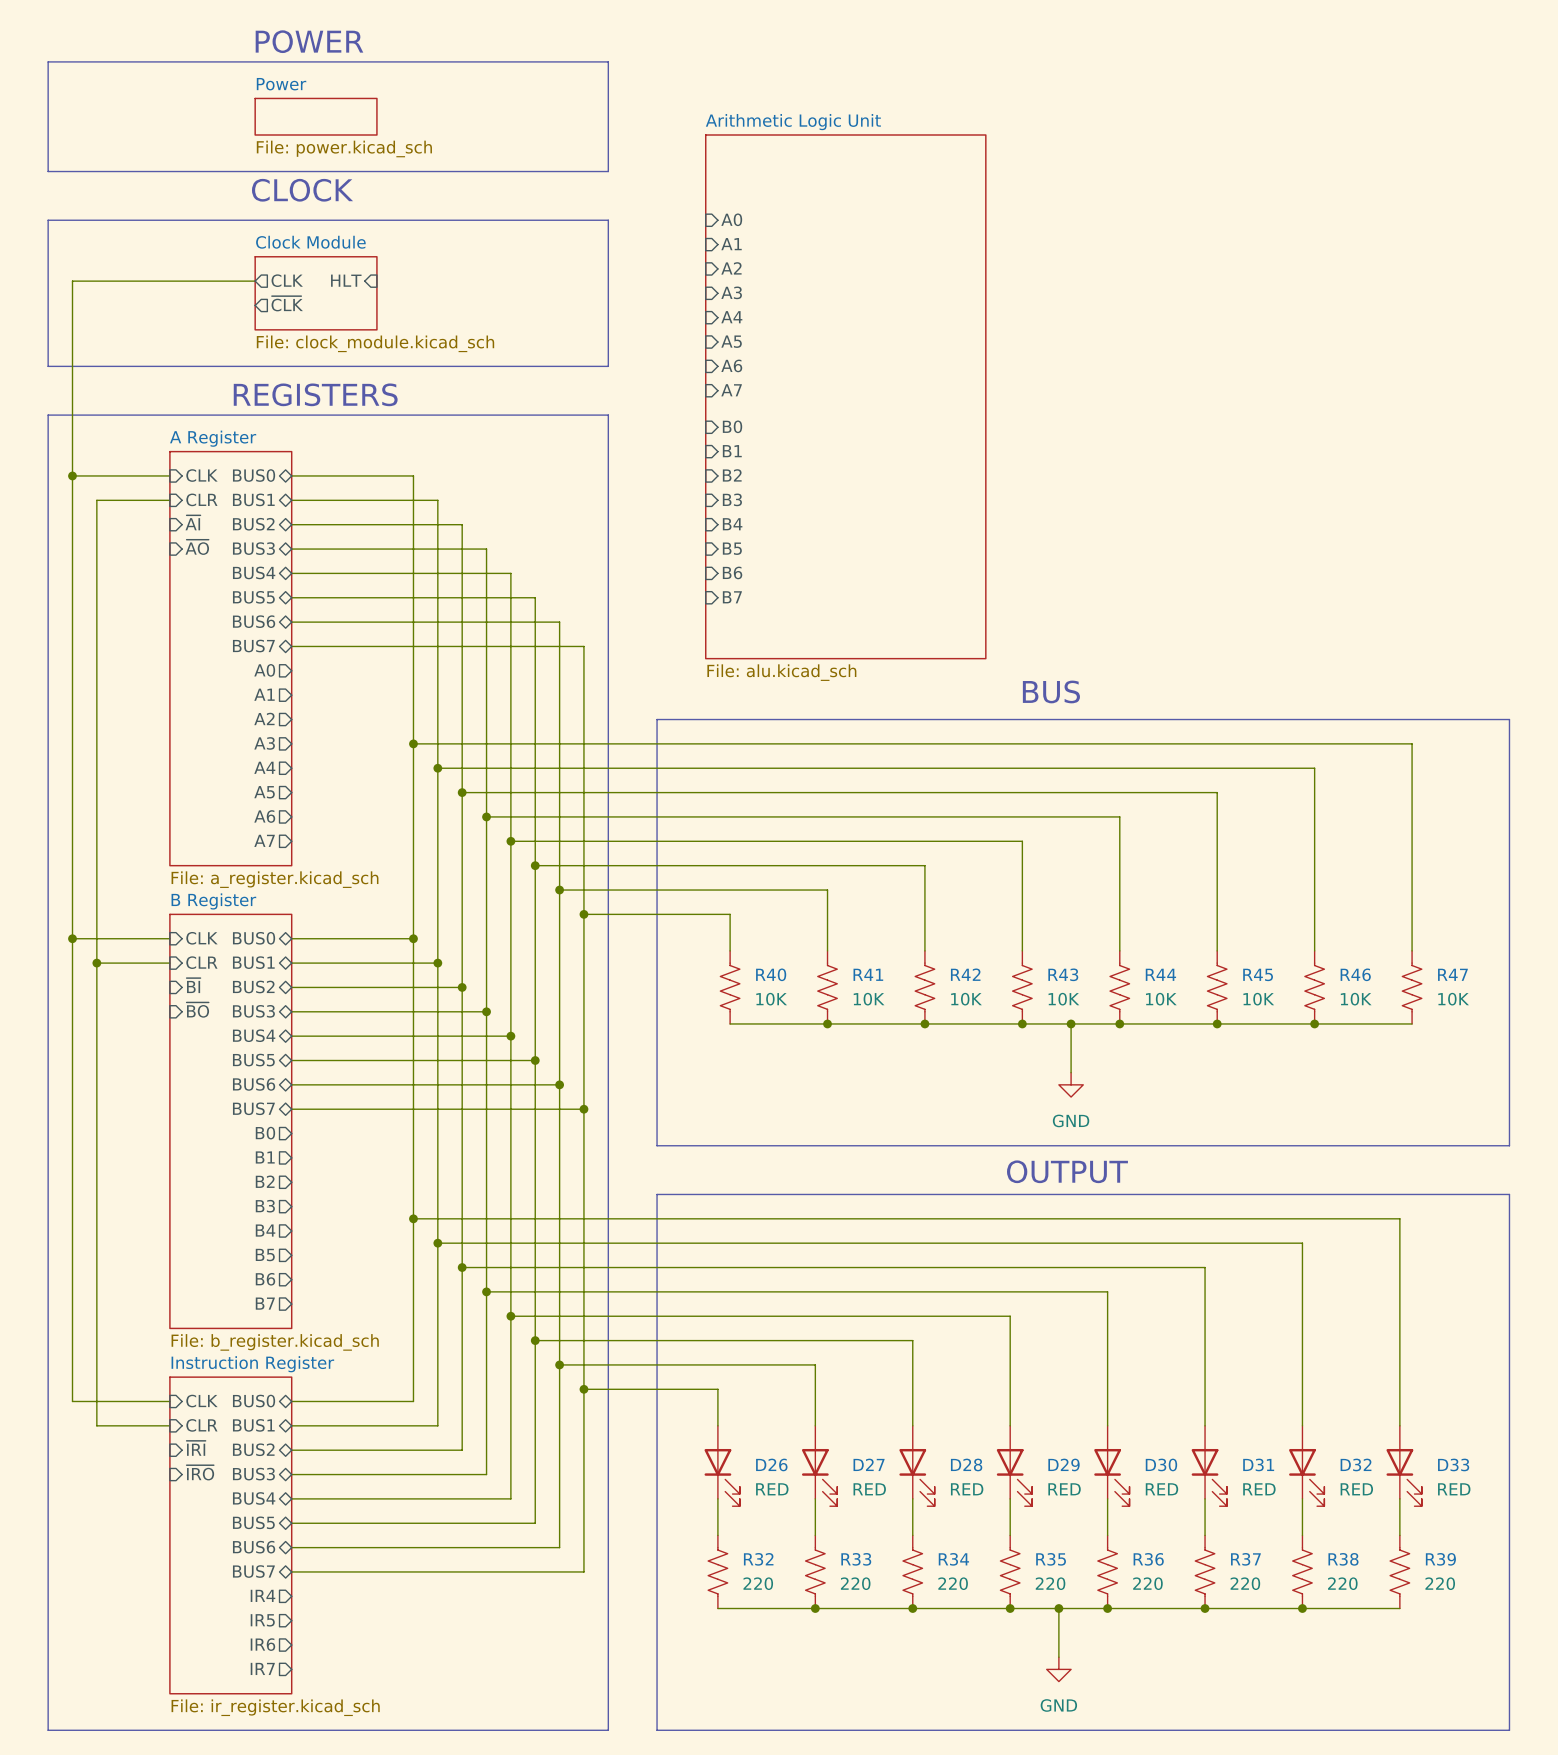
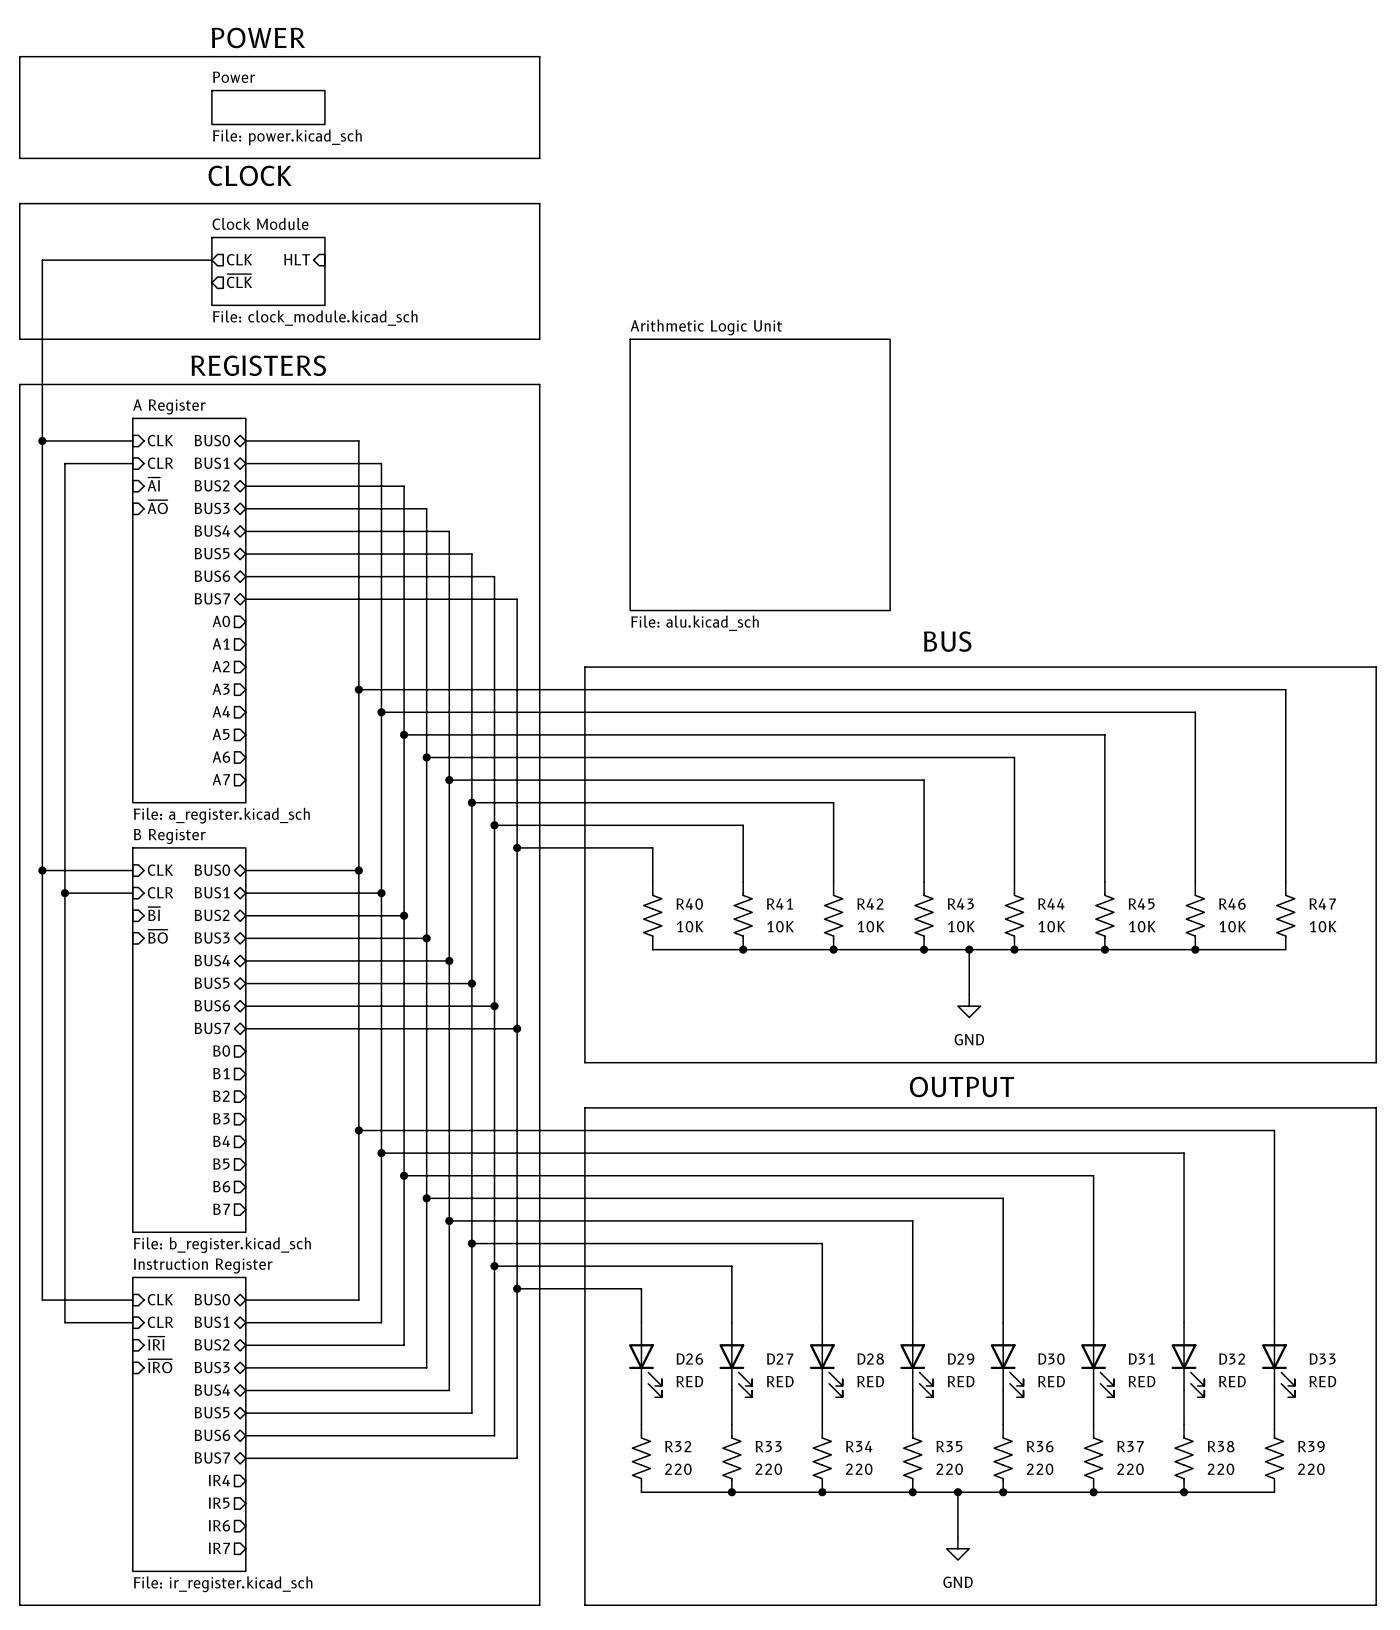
sheet pin: A0 (731, 219) -> none
sheet pin: A1 (731, 244) -> none
sheet pin: A2 (731, 268) -> none
sheet pin: A3 (731, 292) -> none
sheet pin: A4 (731, 317) -> none
sheet pin: A5 (731, 341) -> none
sheet pin: A6 (731, 365) -> none
sheet pin: A7 (731, 390) -> none
sheet Arithmetic Logic Unit: File: alu.kicad_sch (845, 396) -> none
sheet pin: B0 (732, 426) -> none
sheet pin: B1 (732, 451) -> none
sheet pin: B2 (732, 475) -> none
sheet pin: B3 (732, 499) -> none
sheet Arithmetic Logic Unit: none -> File: alu.kicad_sch (760, 474)
sheet pin: B4 (732, 524) -> none
sheet pin: B5 (732, 548) -> none
sheet pin: B6 (732, 572) -> none
sheet pin: B7 (732, 597) -> none

